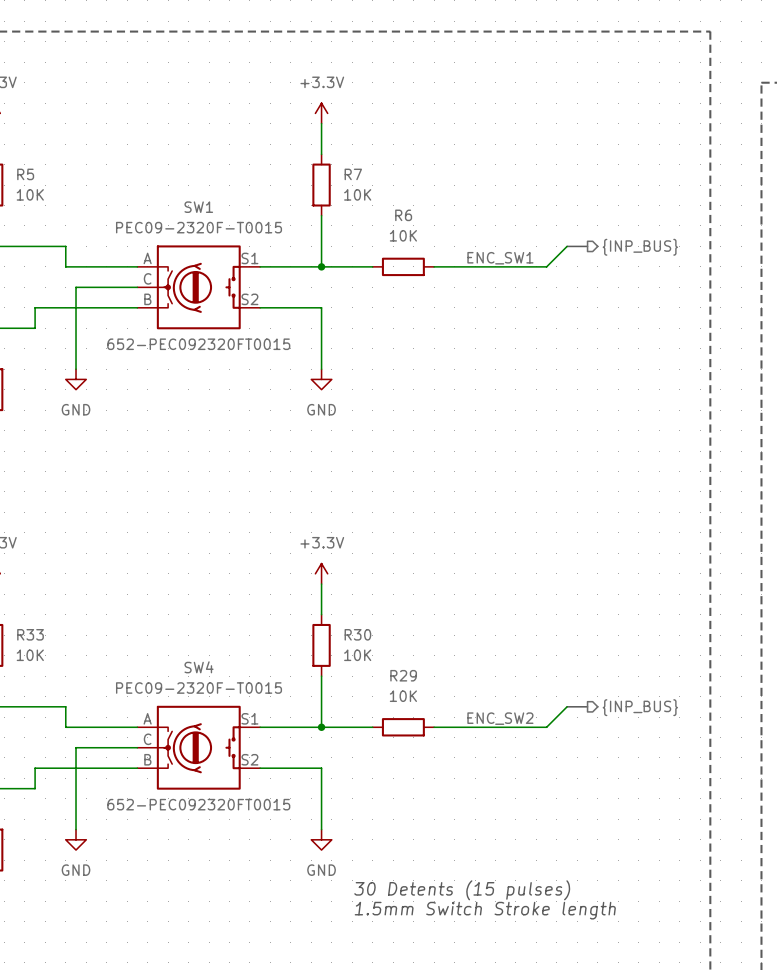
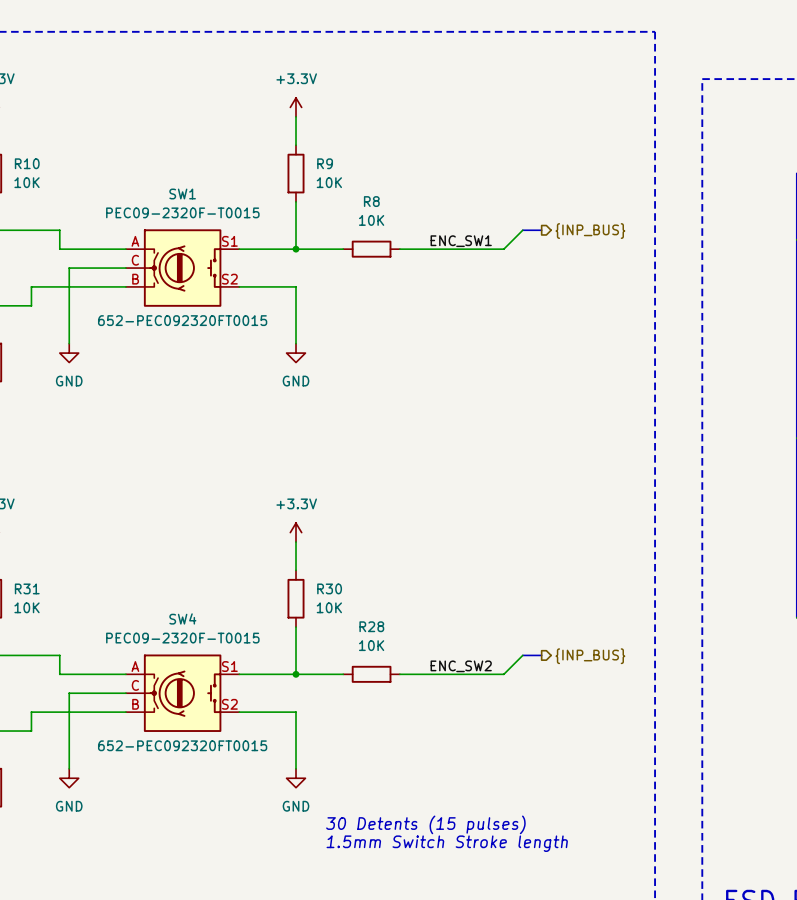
R5 name: R5 (25, 174) -> R10 (27, 163)
R7 name: R7 (353, 174) -> R9 (325, 163)
R6 name: R6 (403, 215) -> R8 (371, 201)
R33 name: R33 (30, 634) -> R31 (27, 588)
R29 name: R29 (403, 675) -> R28 (371, 626)

